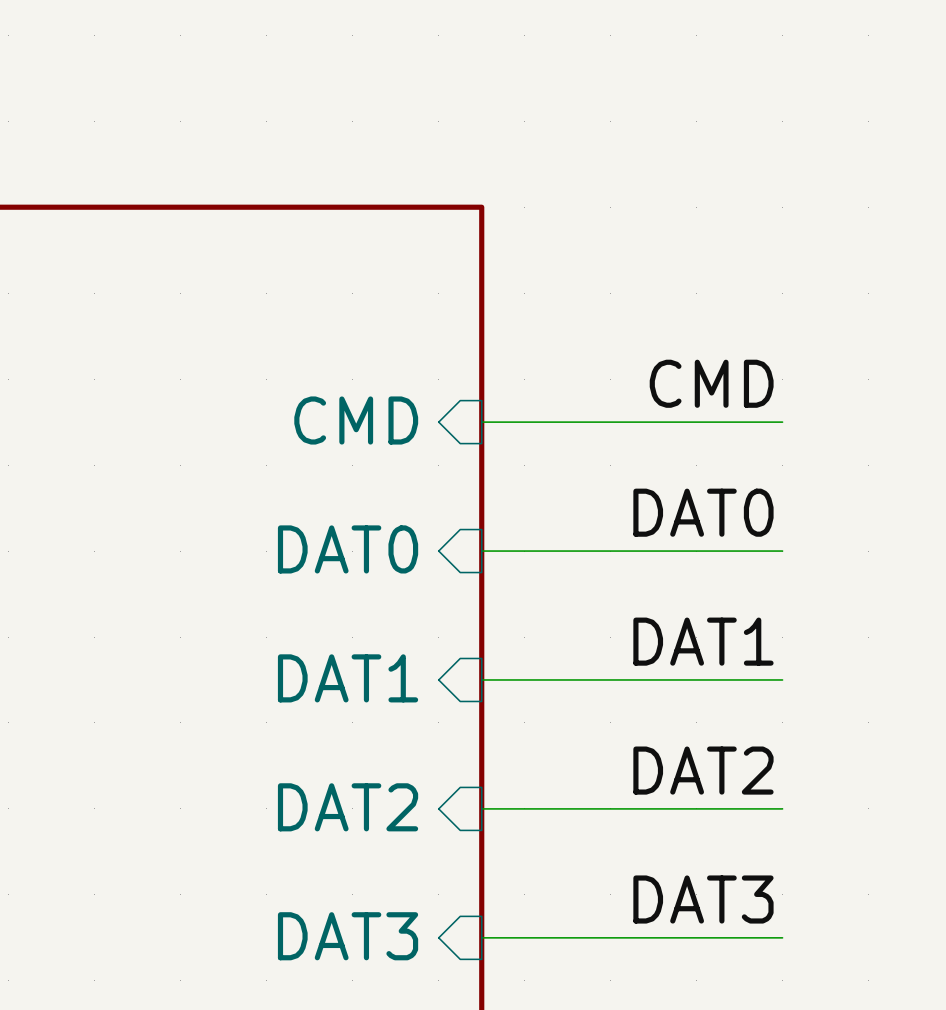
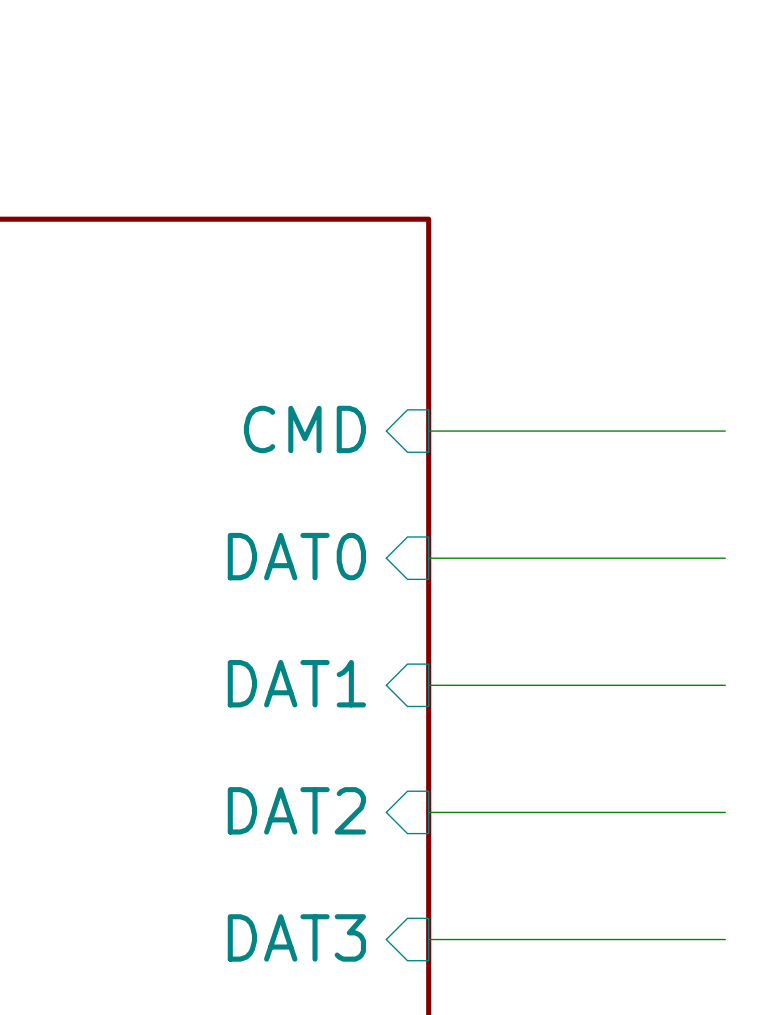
label: CMD (711, 383) -> none
label: DAT0 (703, 512) -> none
label: DAT1 (703, 641) -> none
label: DAT2 (703, 770) -> none
label: DAT3 (703, 899) -> none

